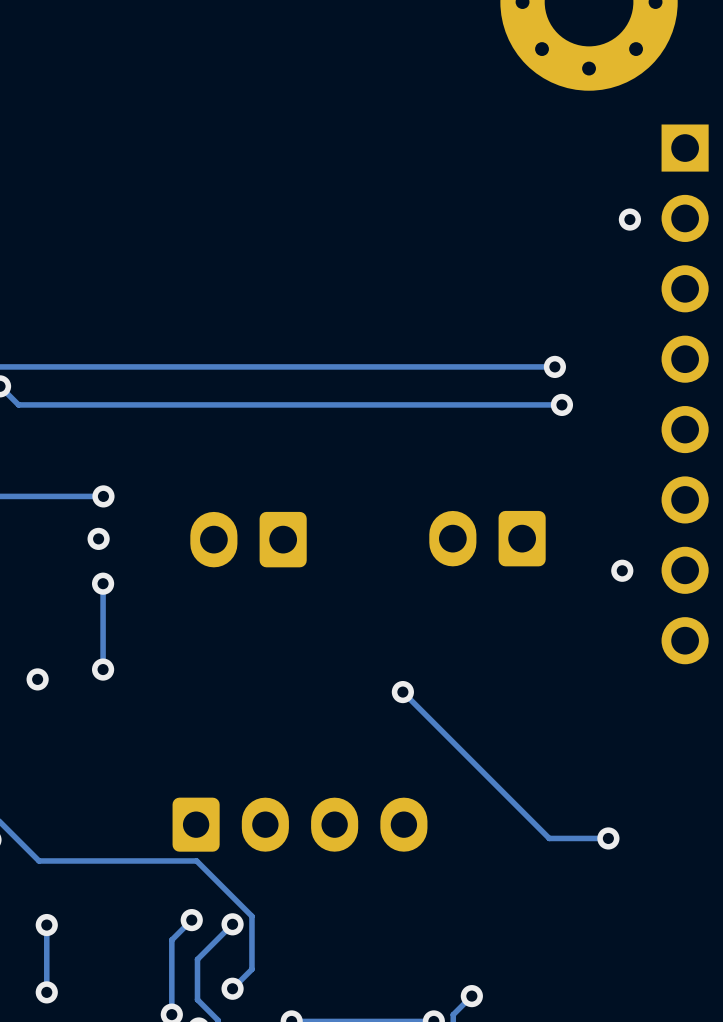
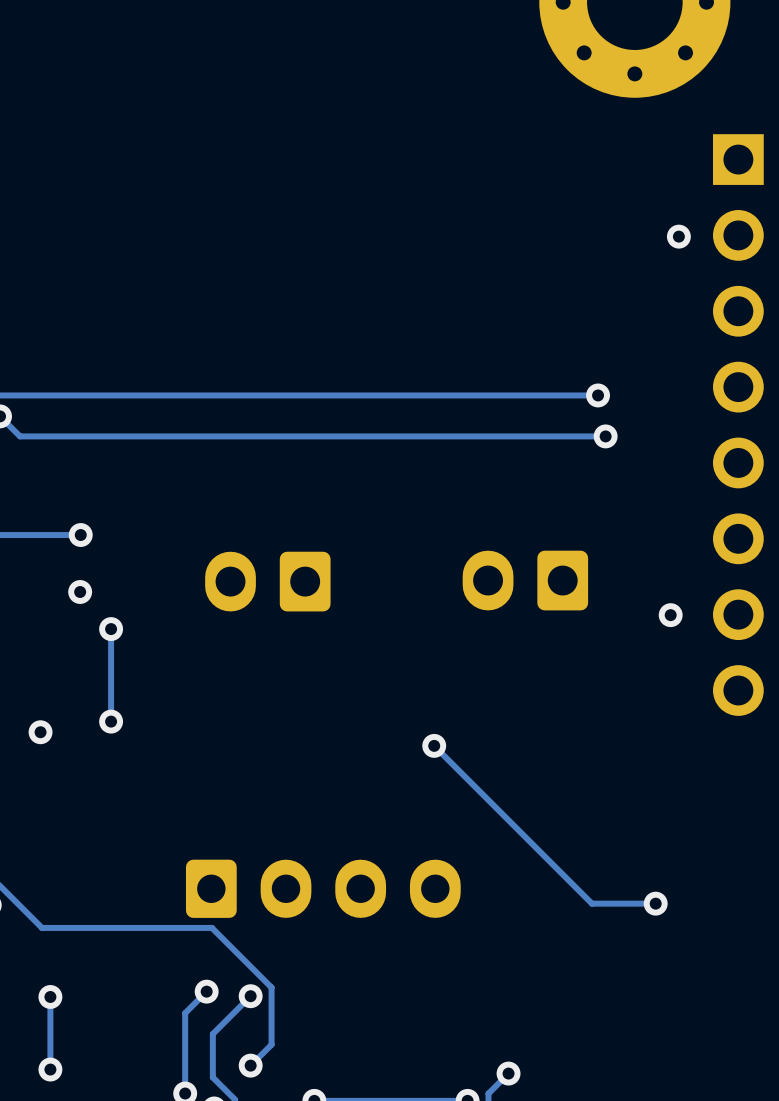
via: none -> (80, 535)
track: (103, 496) (74, 496) -> none
via: (103, 496) -> none
via: (98, 538) -> none
via: none -> (80, 592)

